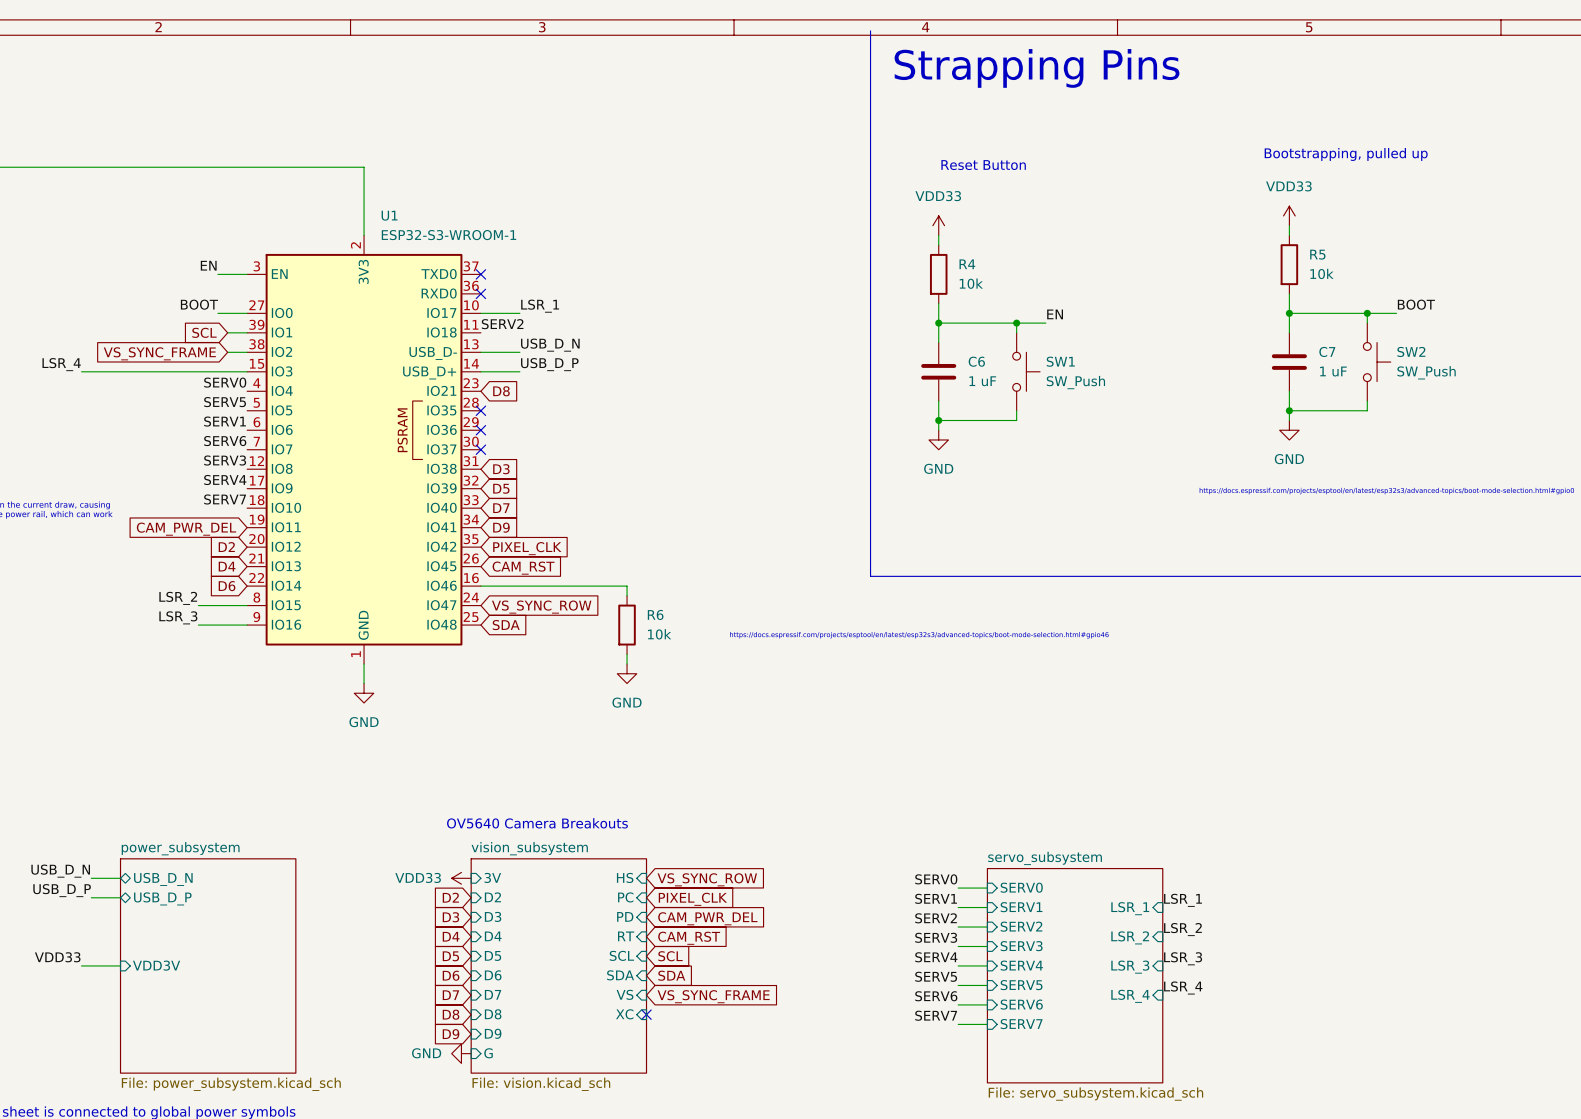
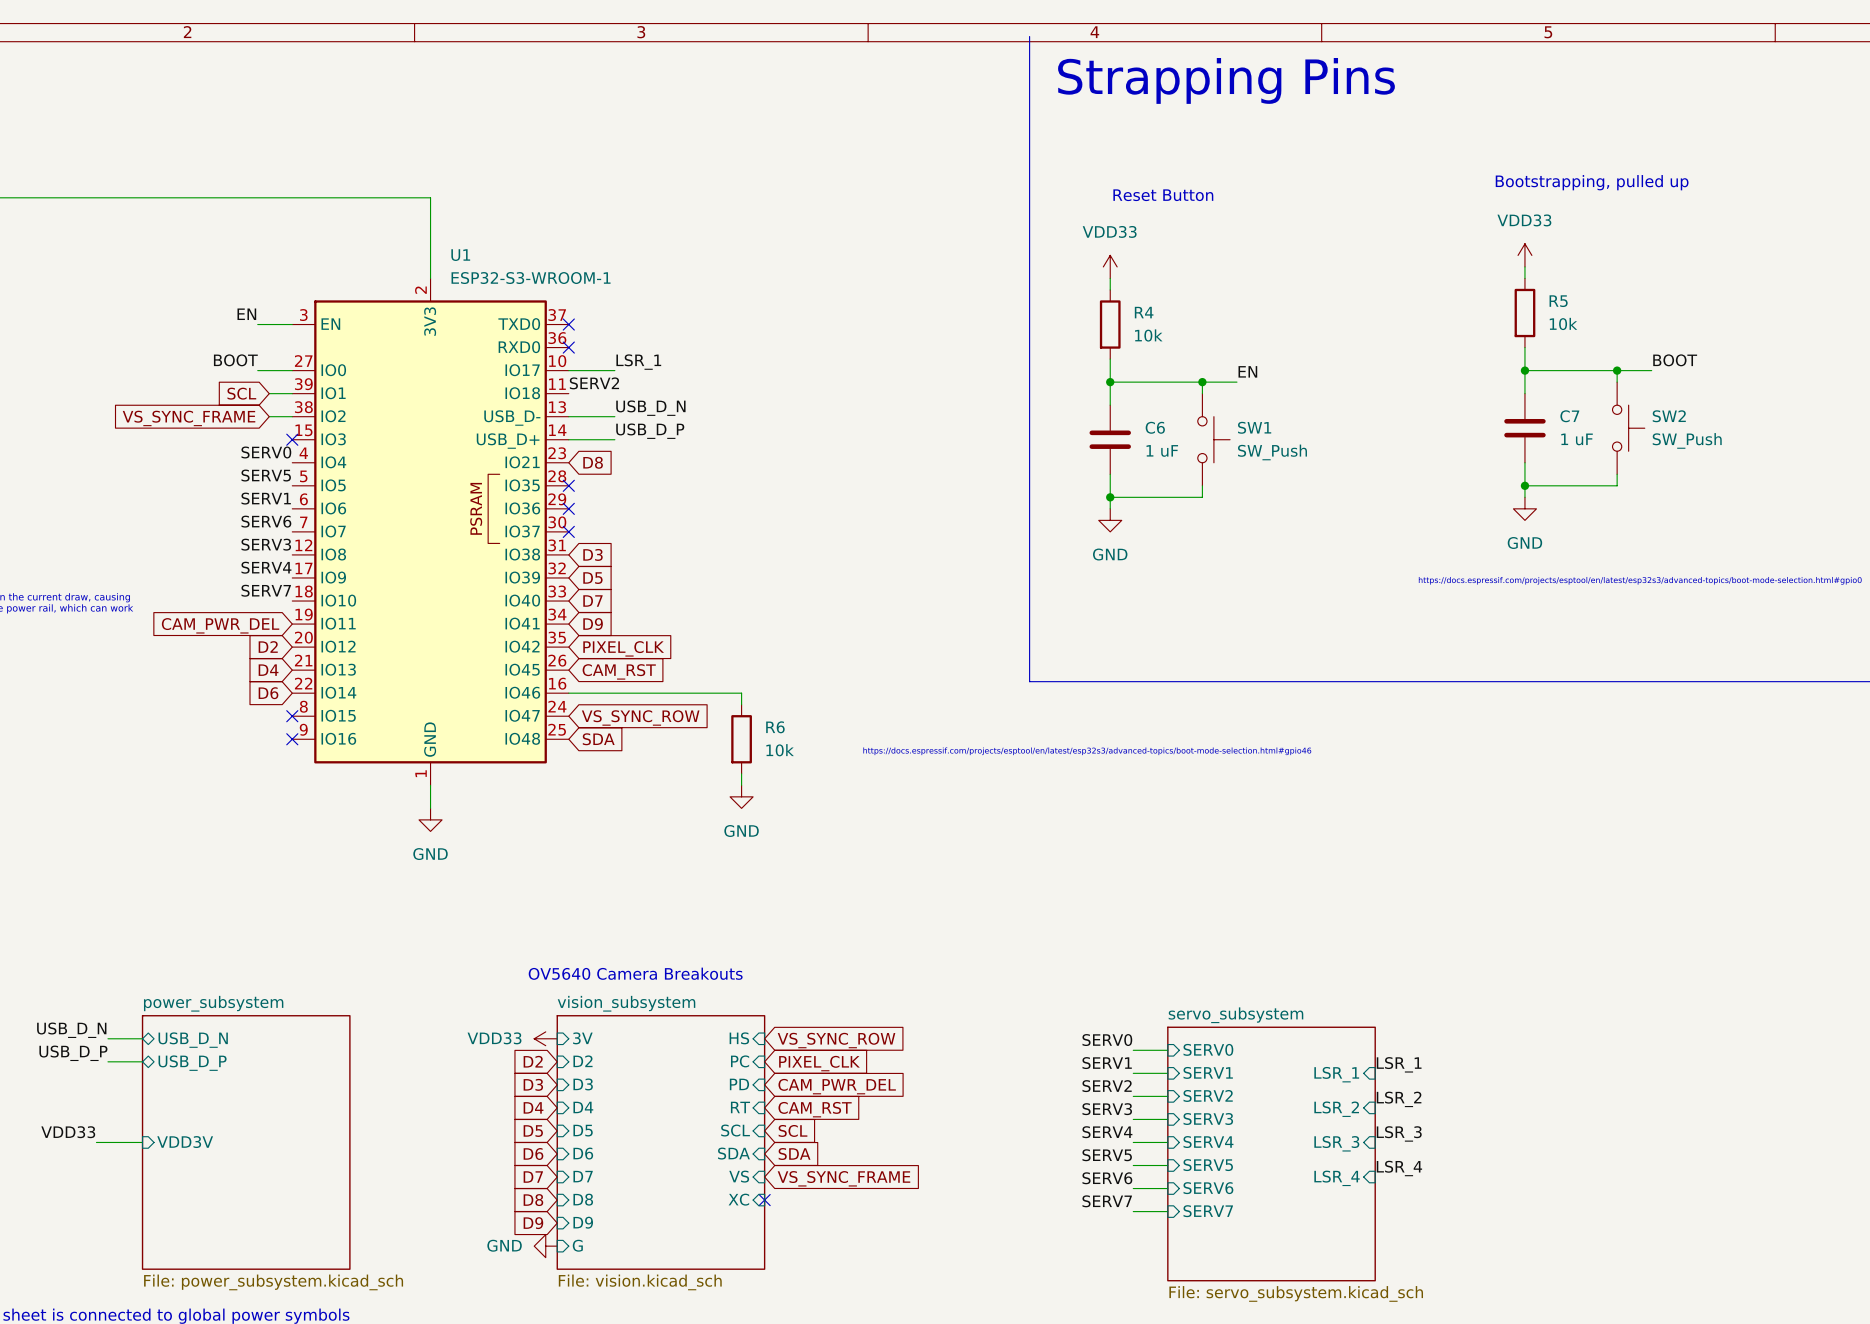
label: LSR_4 (61, 364) -> none
wire: (81, 371) (247, 371) -> none
no-connect mark: none -> (292, 439)
label: LSR_2 (178, 598) -> none
wire: (198, 605) (247, 605) -> none
no-connect mark: none -> (292, 716)
label: LSR_3 (178, 617) -> none
wire: (198, 625) (247, 625) -> none
no-connect mark: none -> (292, 739)

